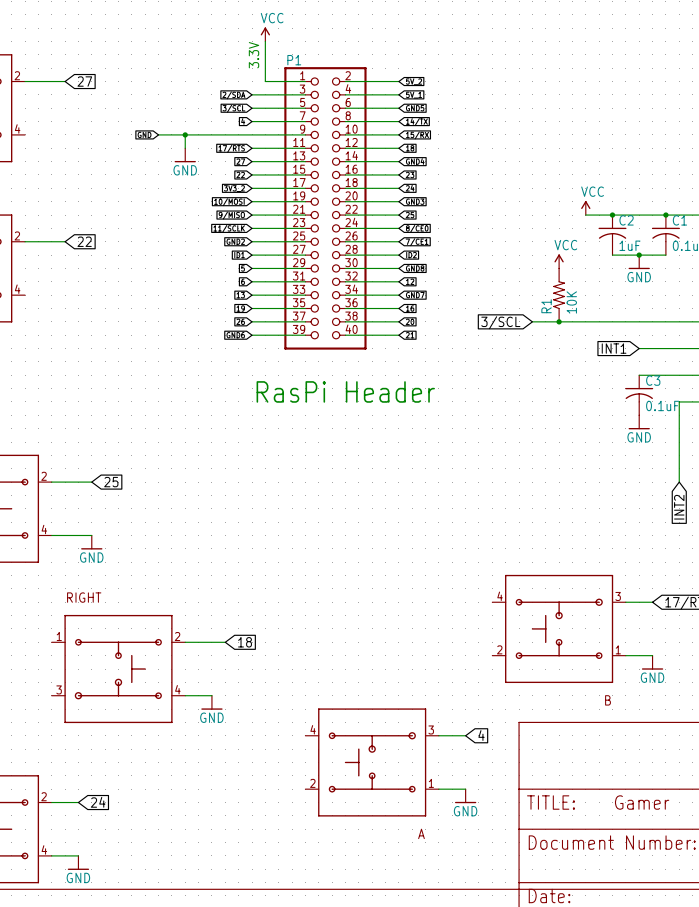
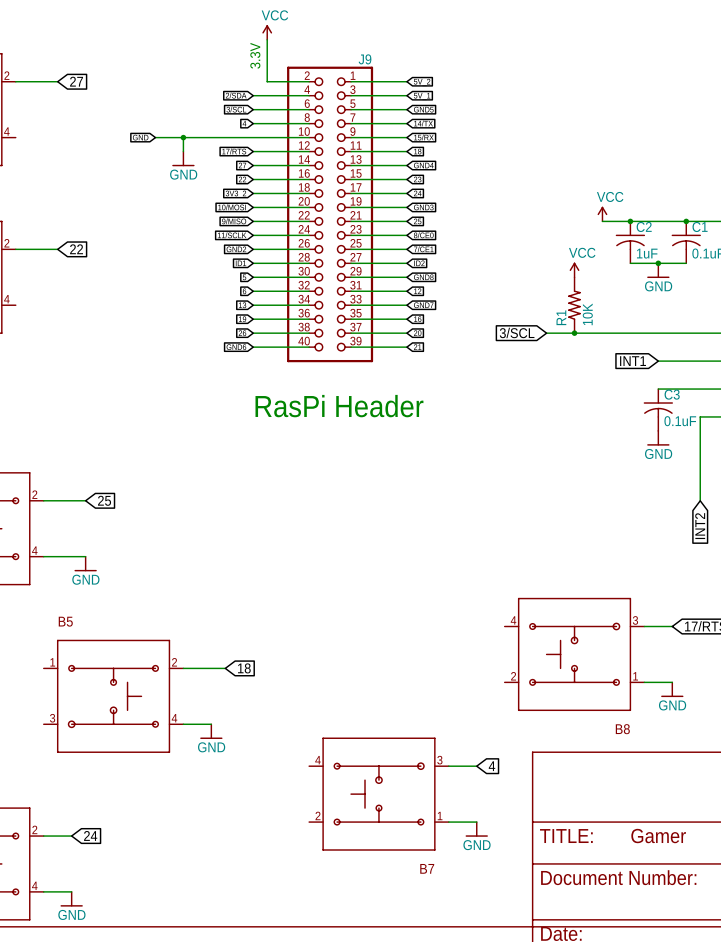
P1 name: P1 (294, 60) -> J9 (365, 59)
P1 flip: as is (325, 208) -> left-right (330, 214)
RIGHT name: RIGHT (84, 597) -> B5 (65, 621)
B name: B (608, 700) -> B8 (622, 729)
A name: A (421, 833) -> B7 (427, 868)

